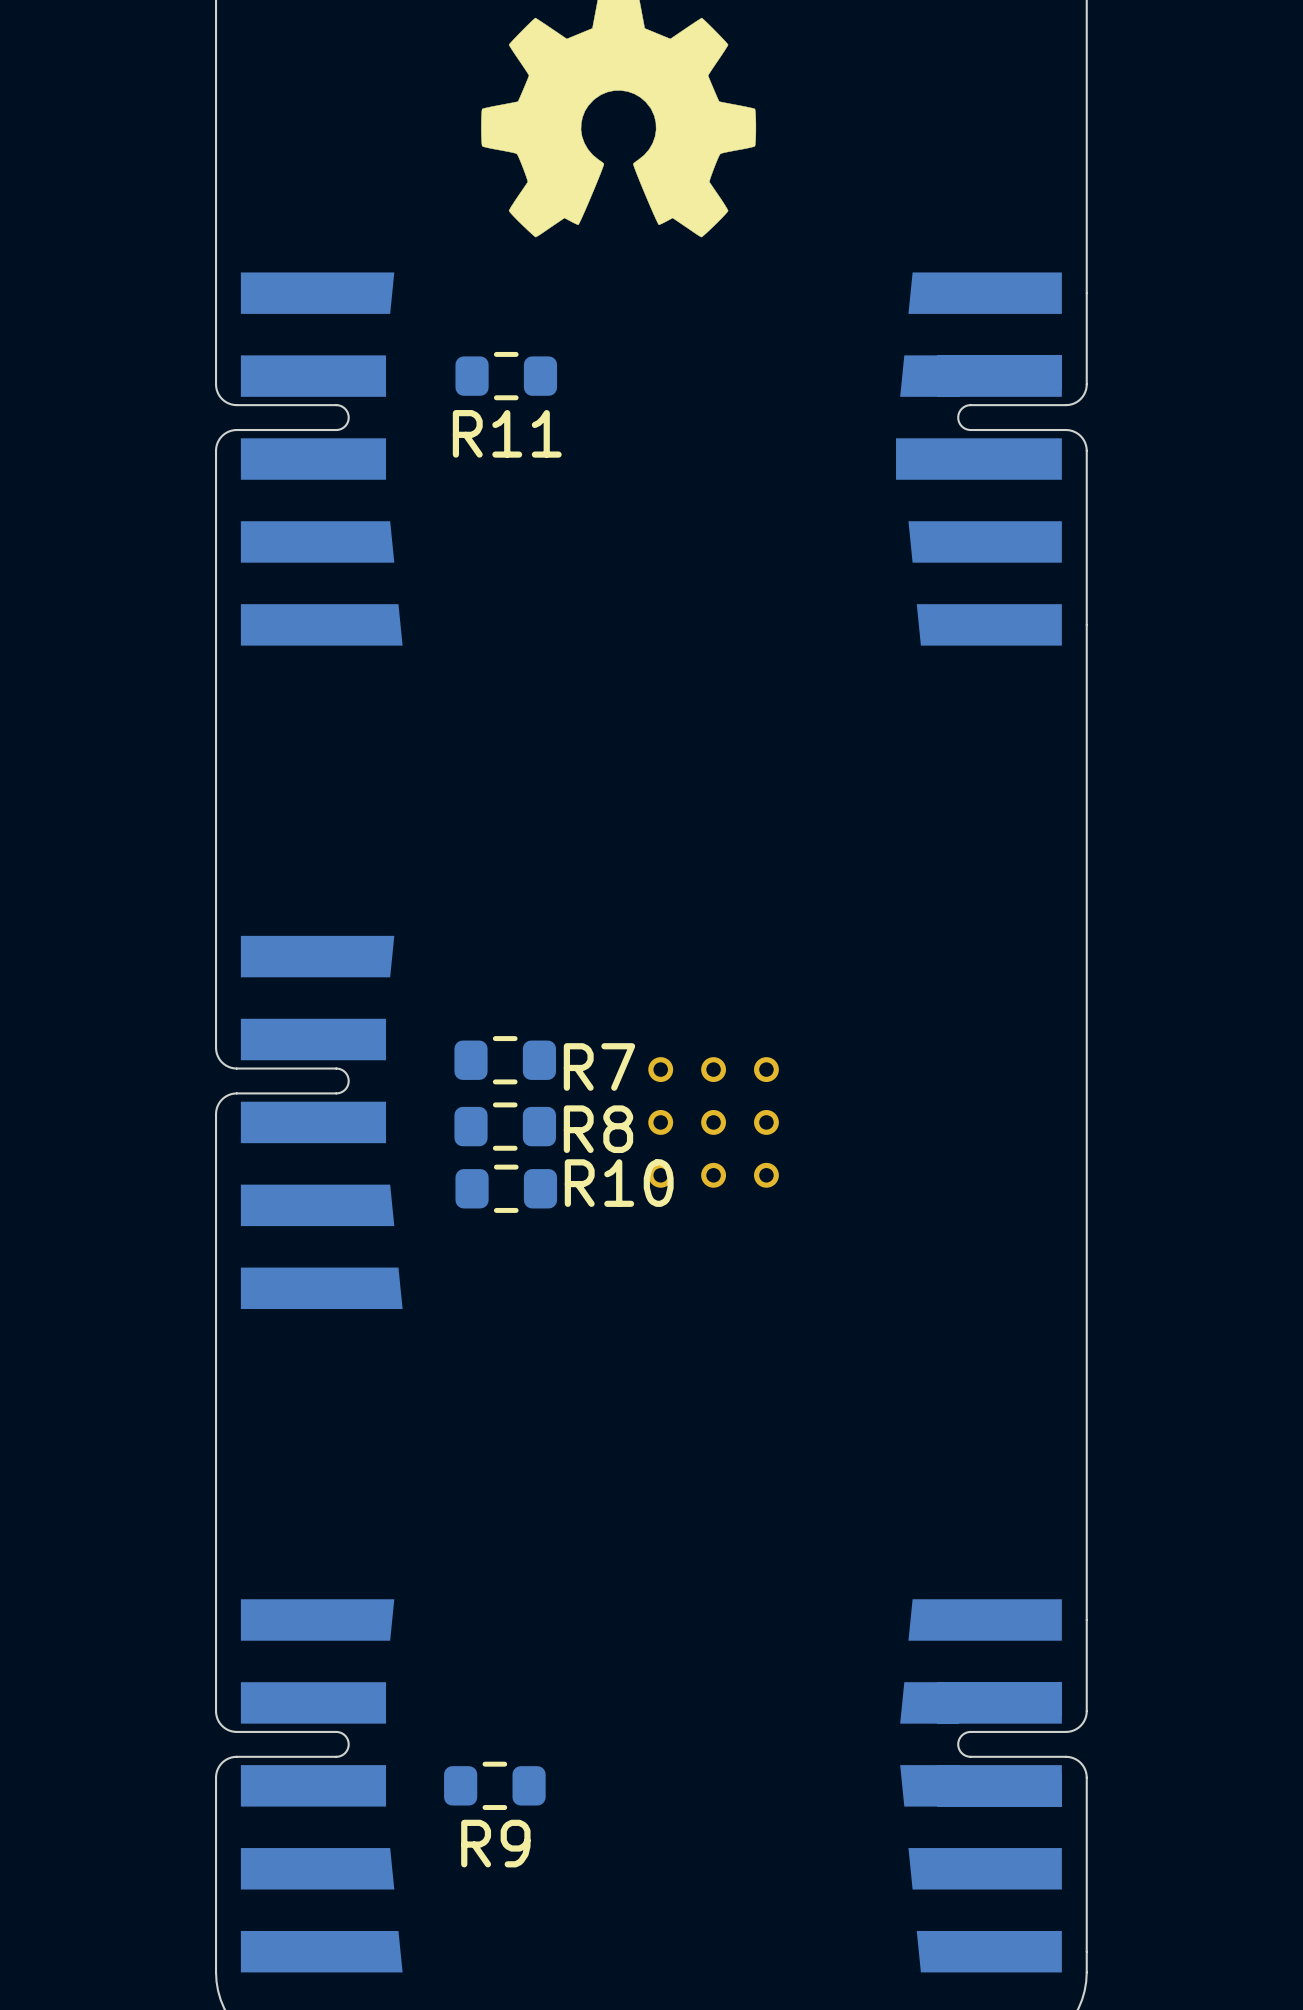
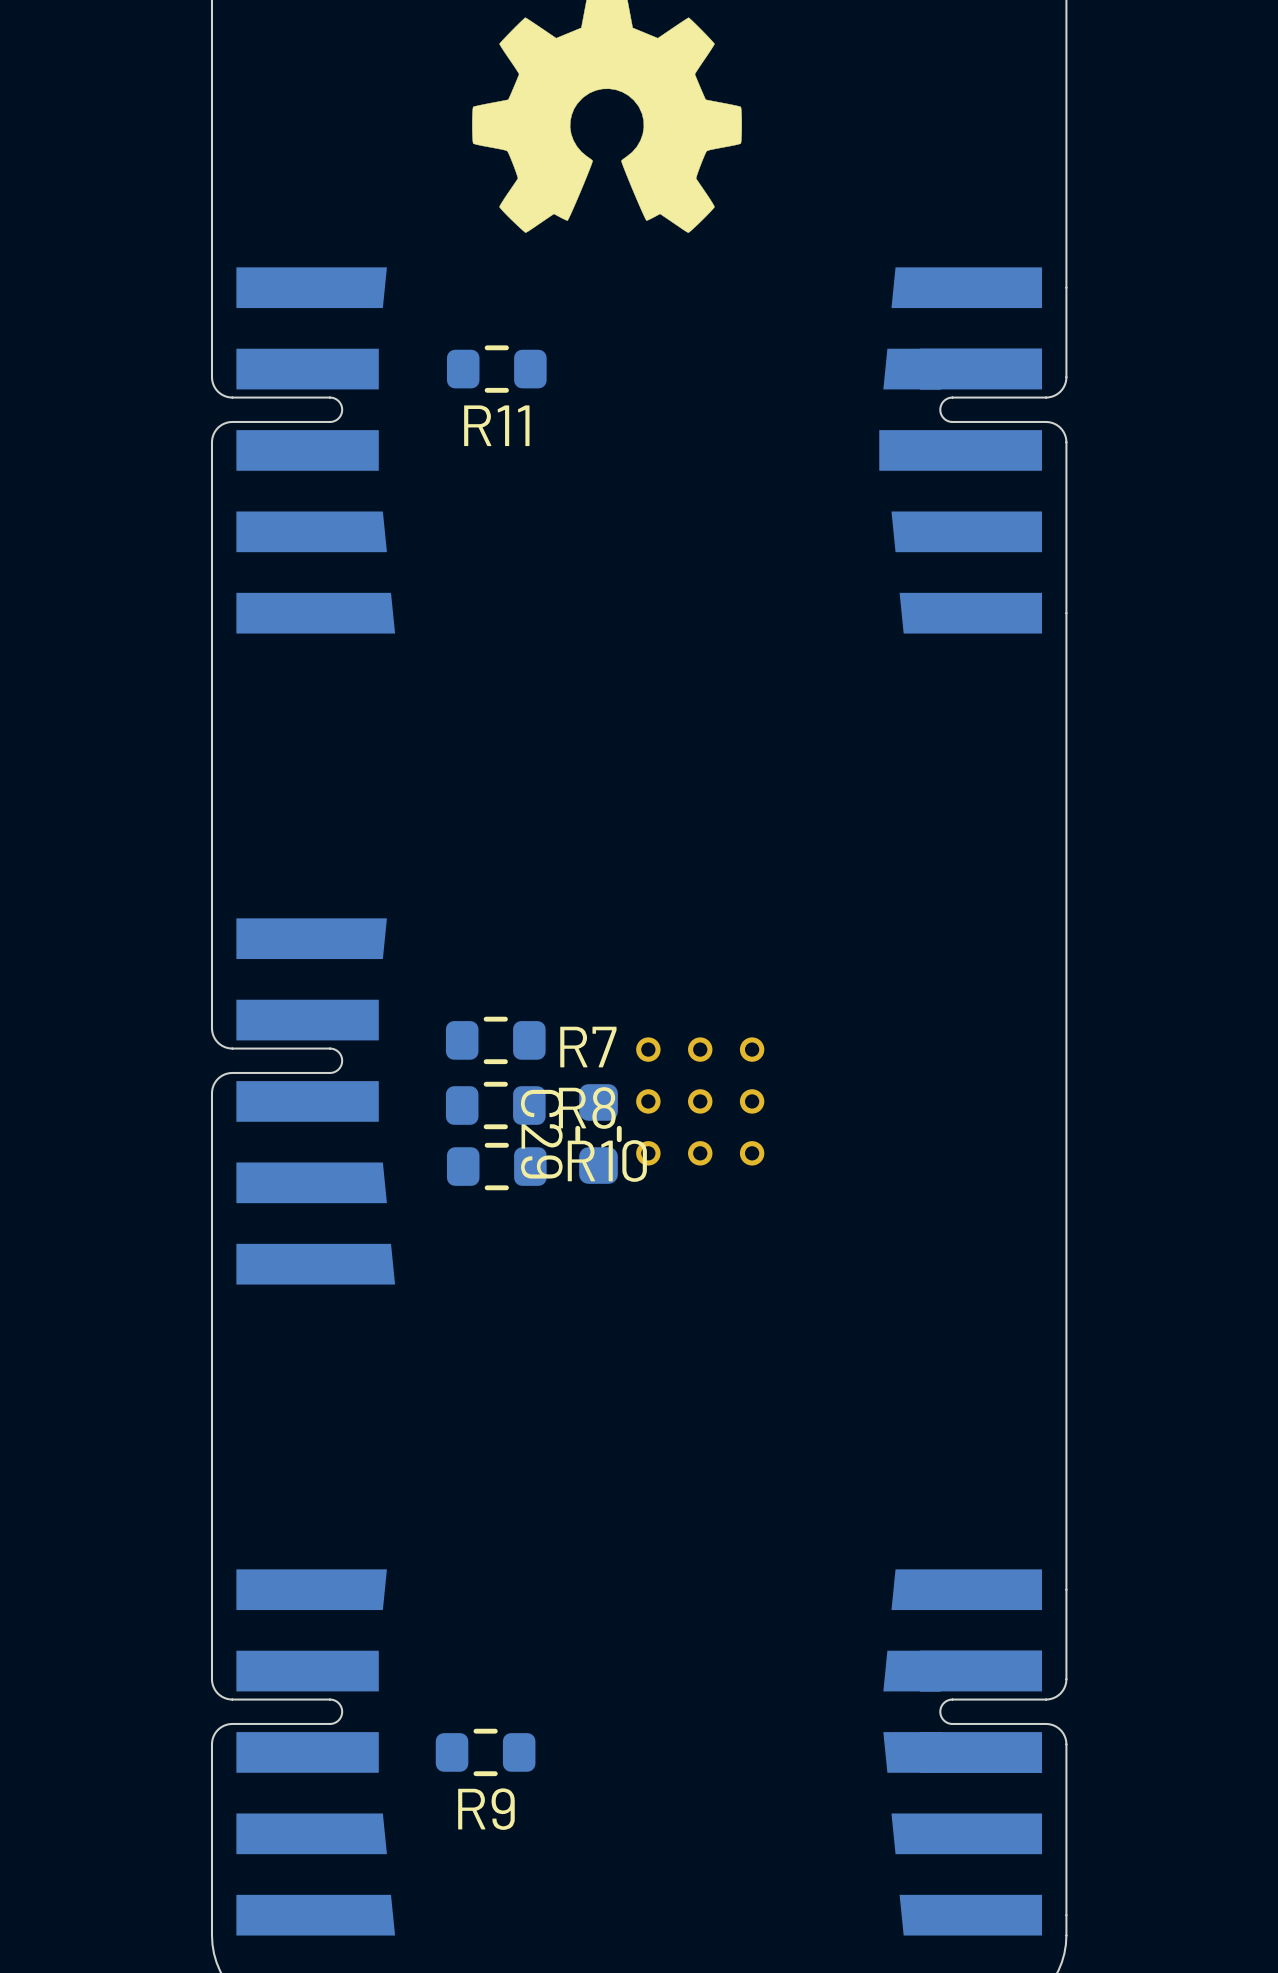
C29: none -> (598, 1133)

